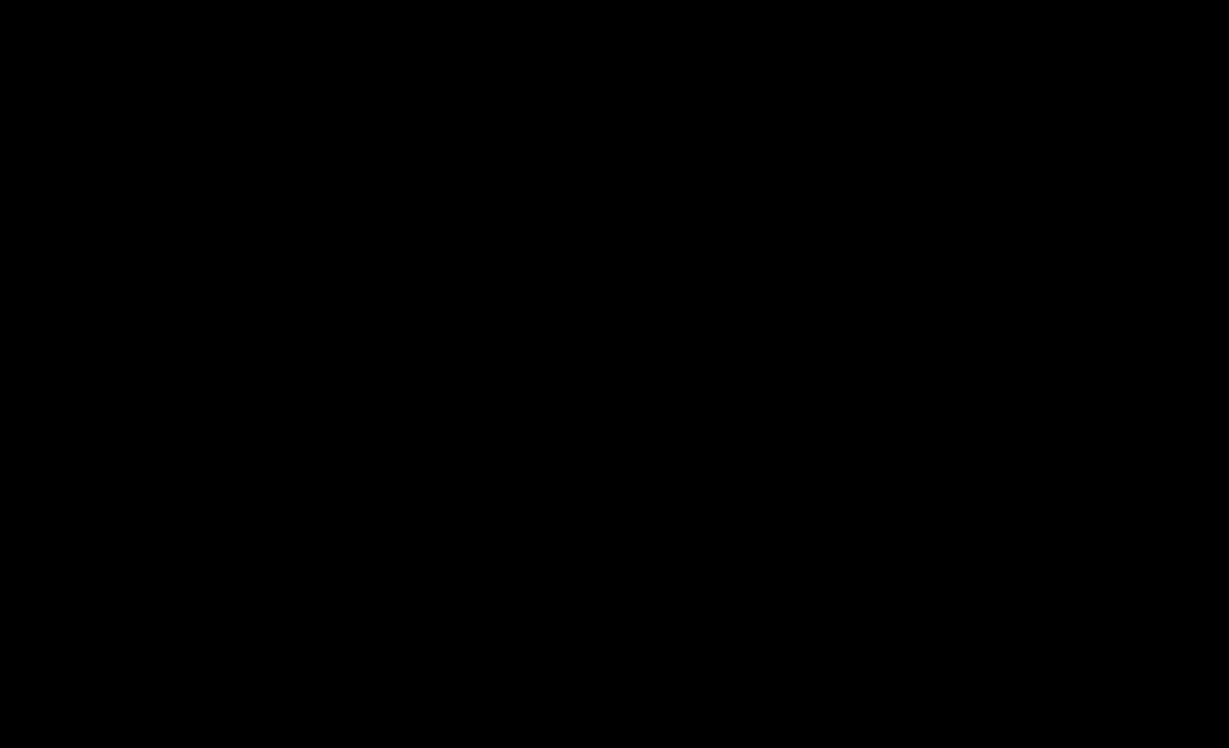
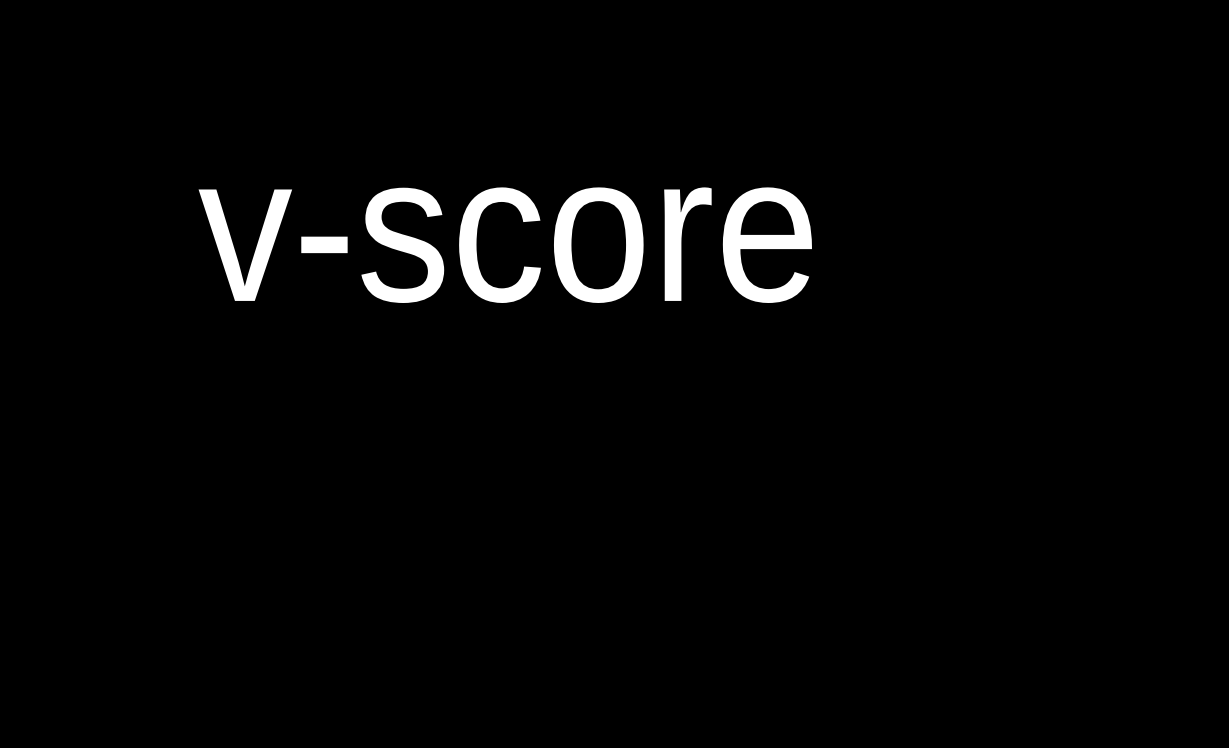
text: none -> v-score (505, 245)

